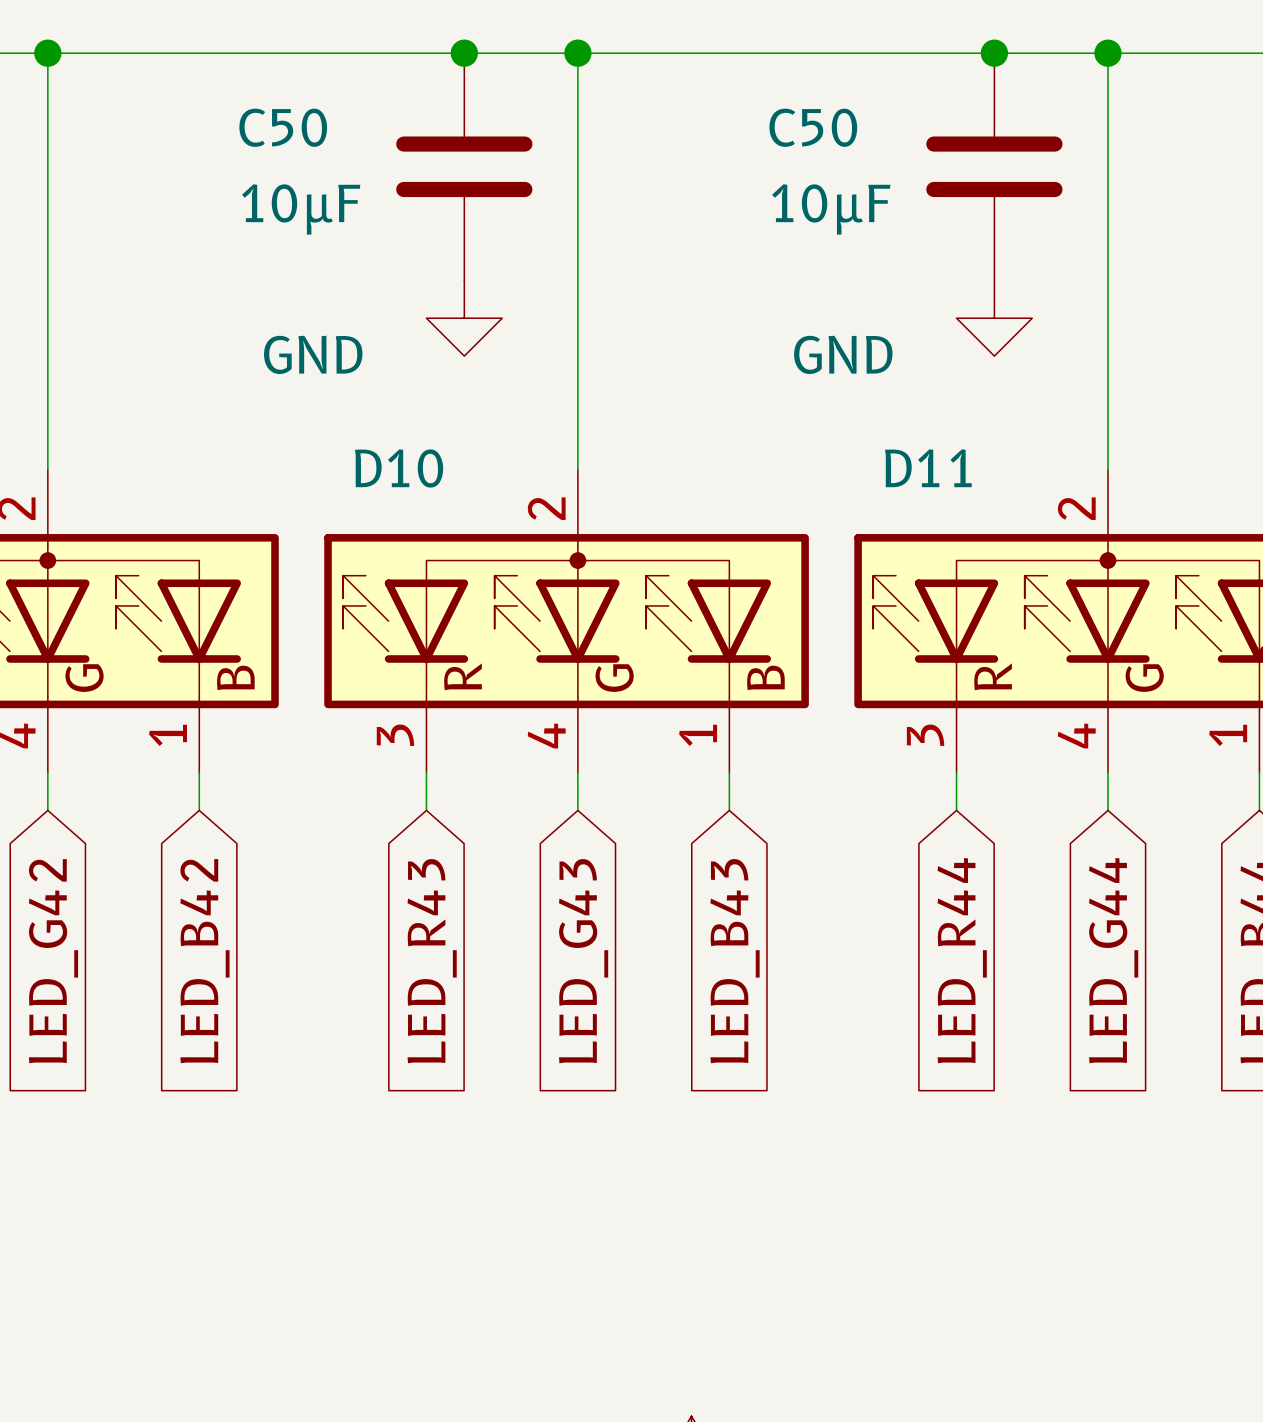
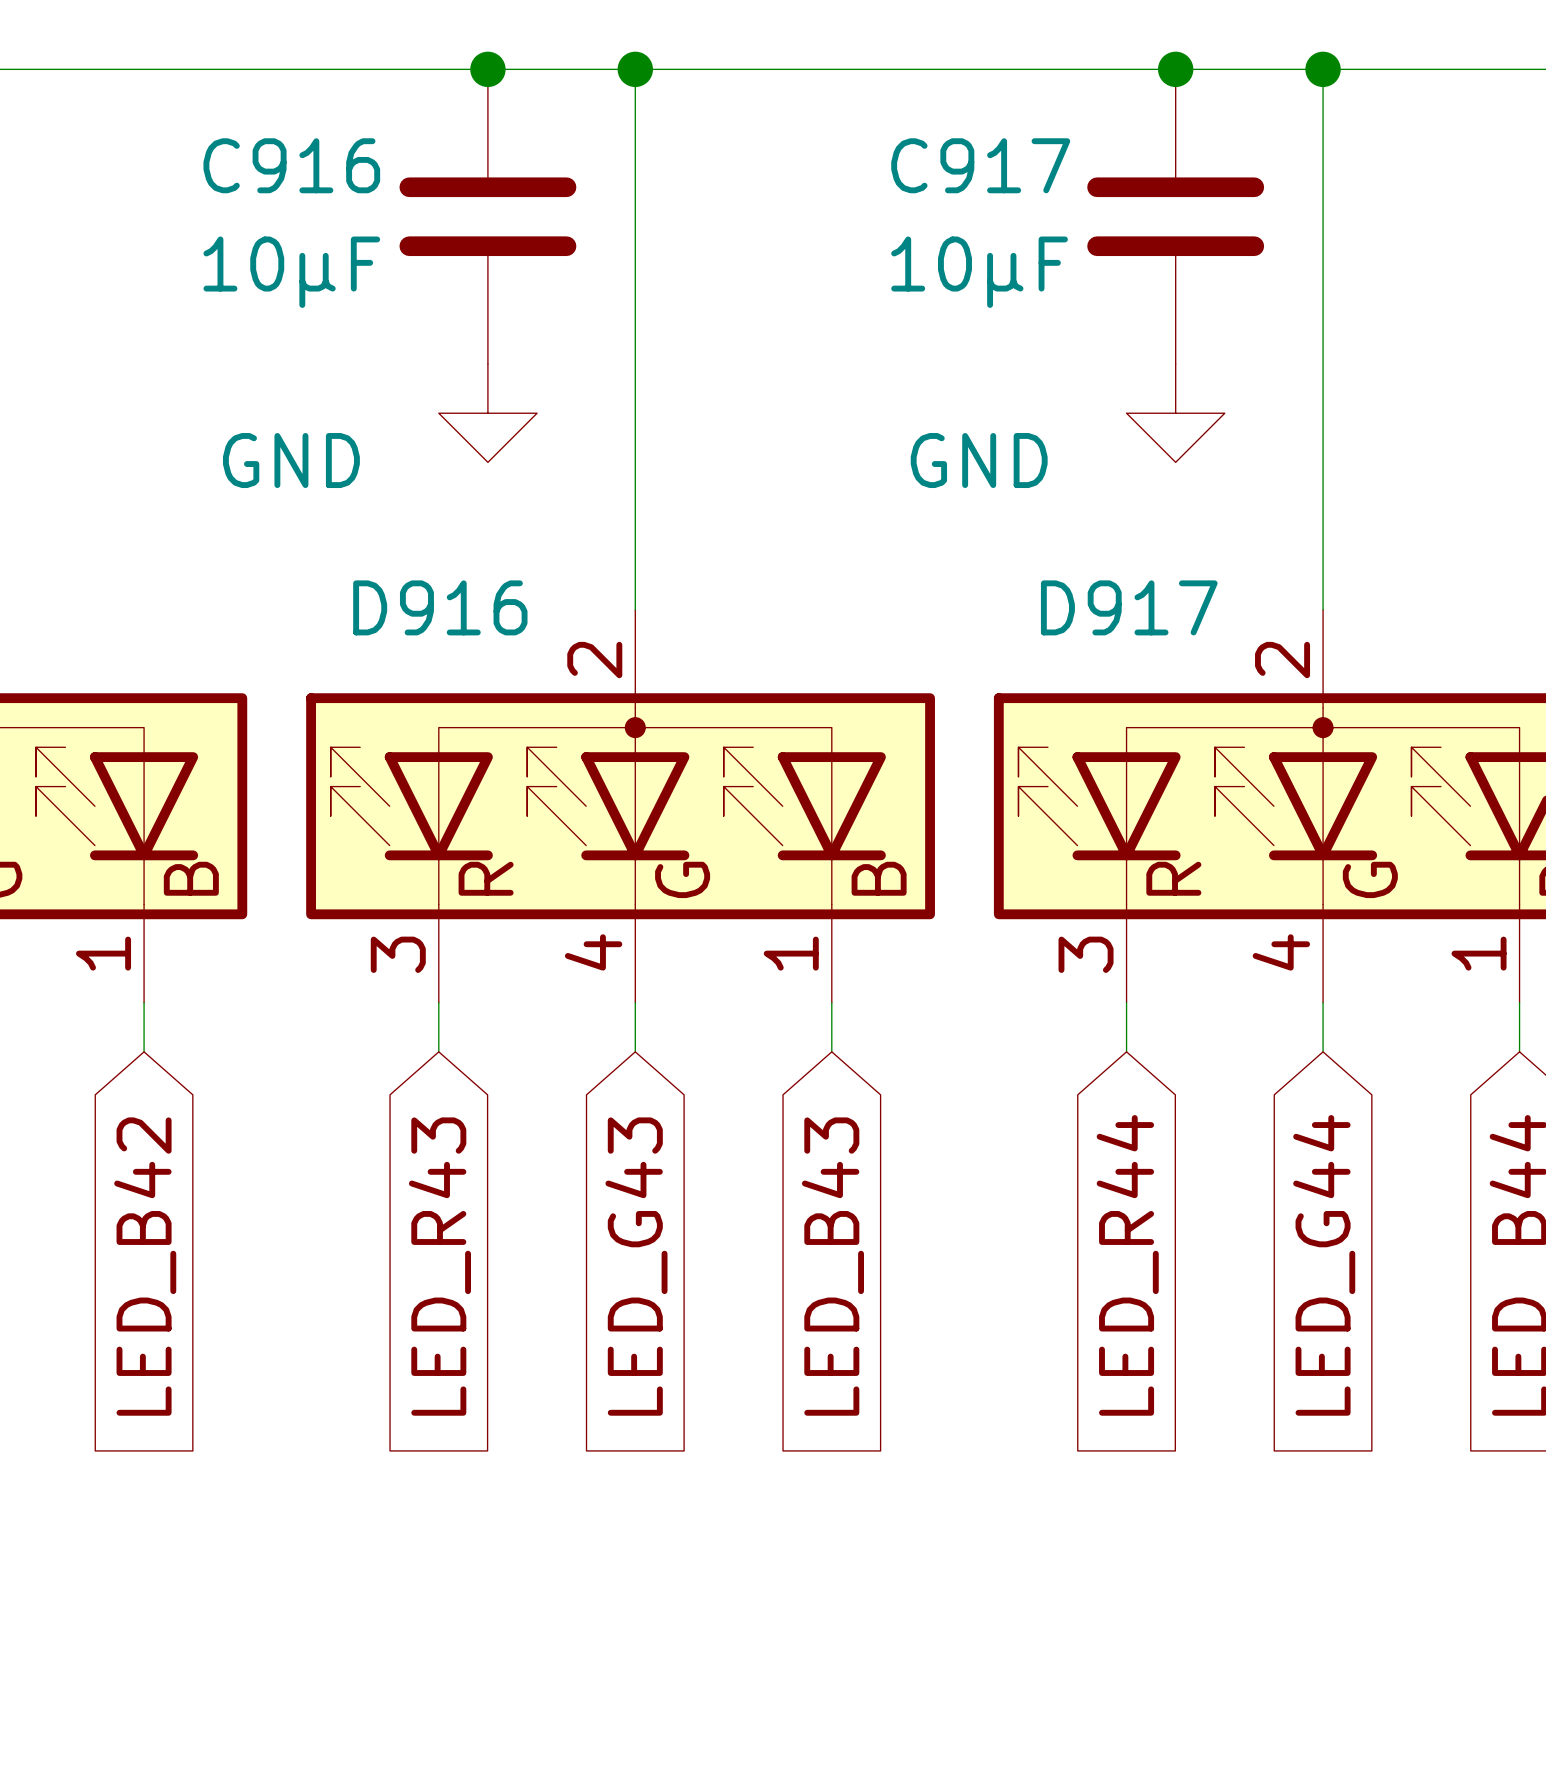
C50 name: C50 (283, 127) -> C916 (291, 165)
C50 name: C50 (813, 127) -> C917 (980, 165)
D10 name: D10 (399, 468) -> D916 (440, 607)
D11 name: D11 (928, 468) -> D917 (1129, 607)

